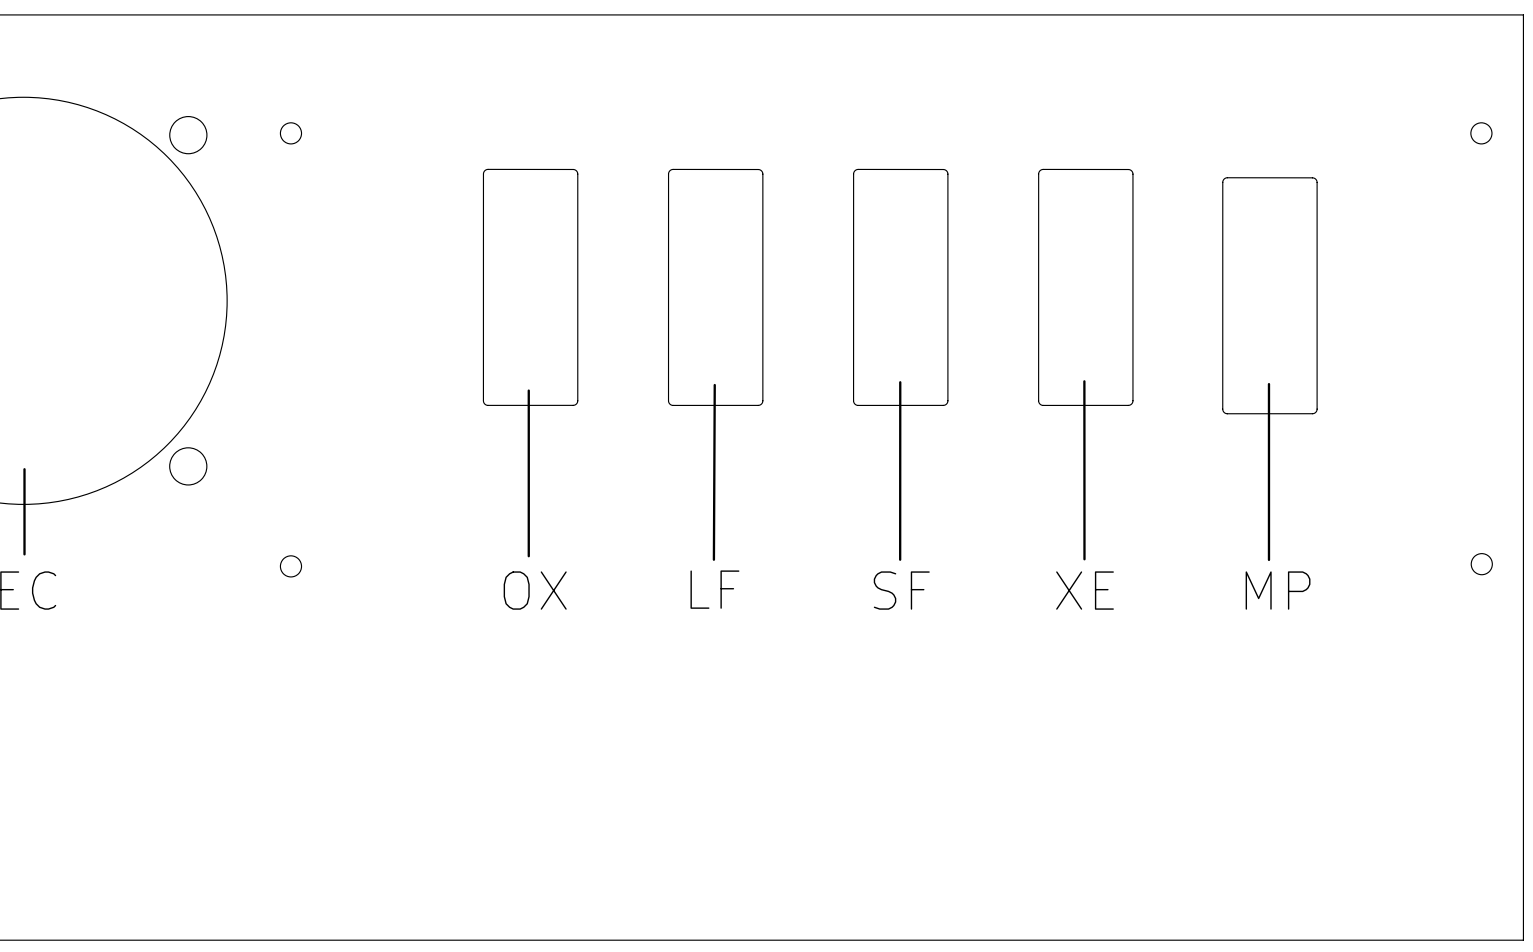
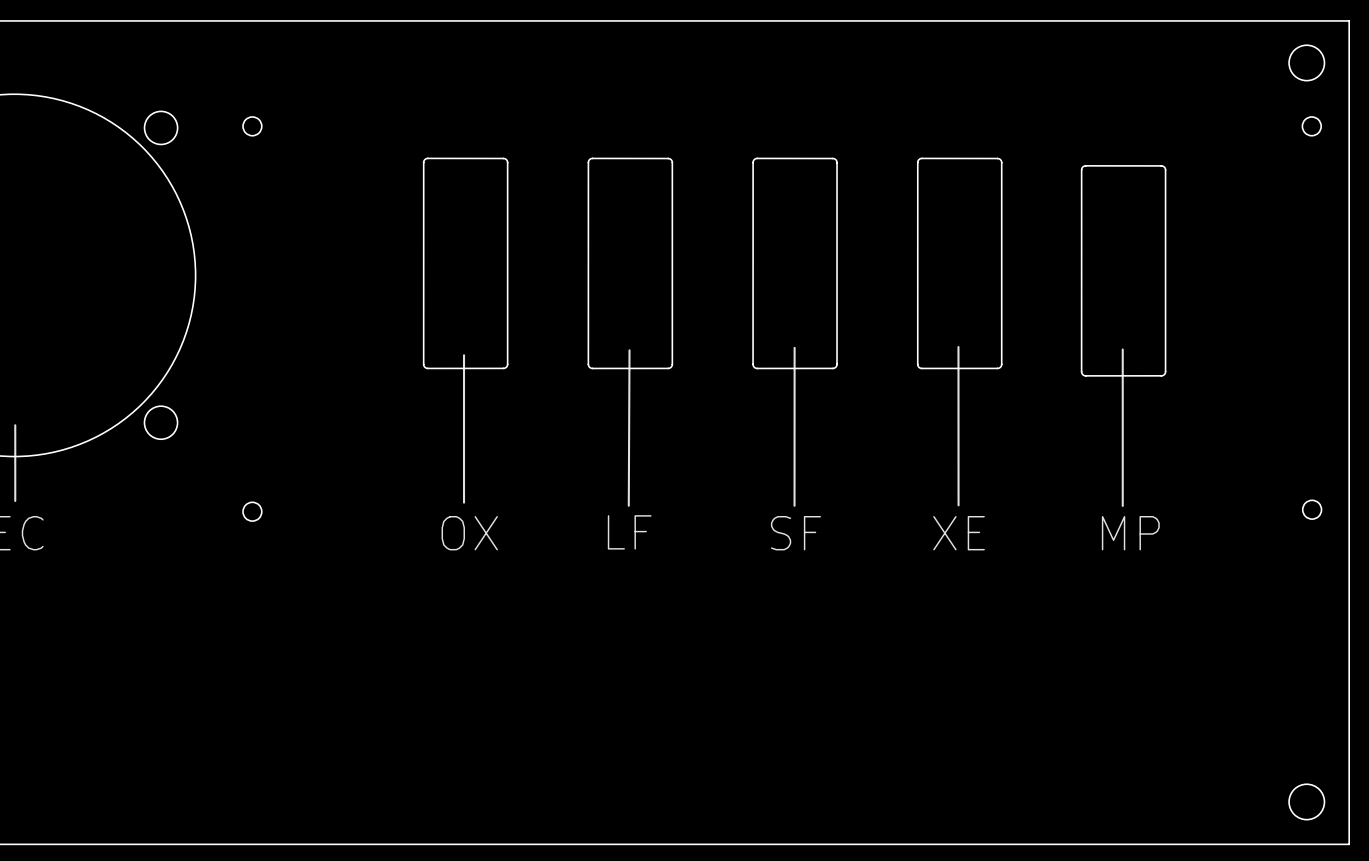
round board edge: none -> [1288, 44, 1325, 82]
round board edge: none -> [1288, 783, 1325, 821]

